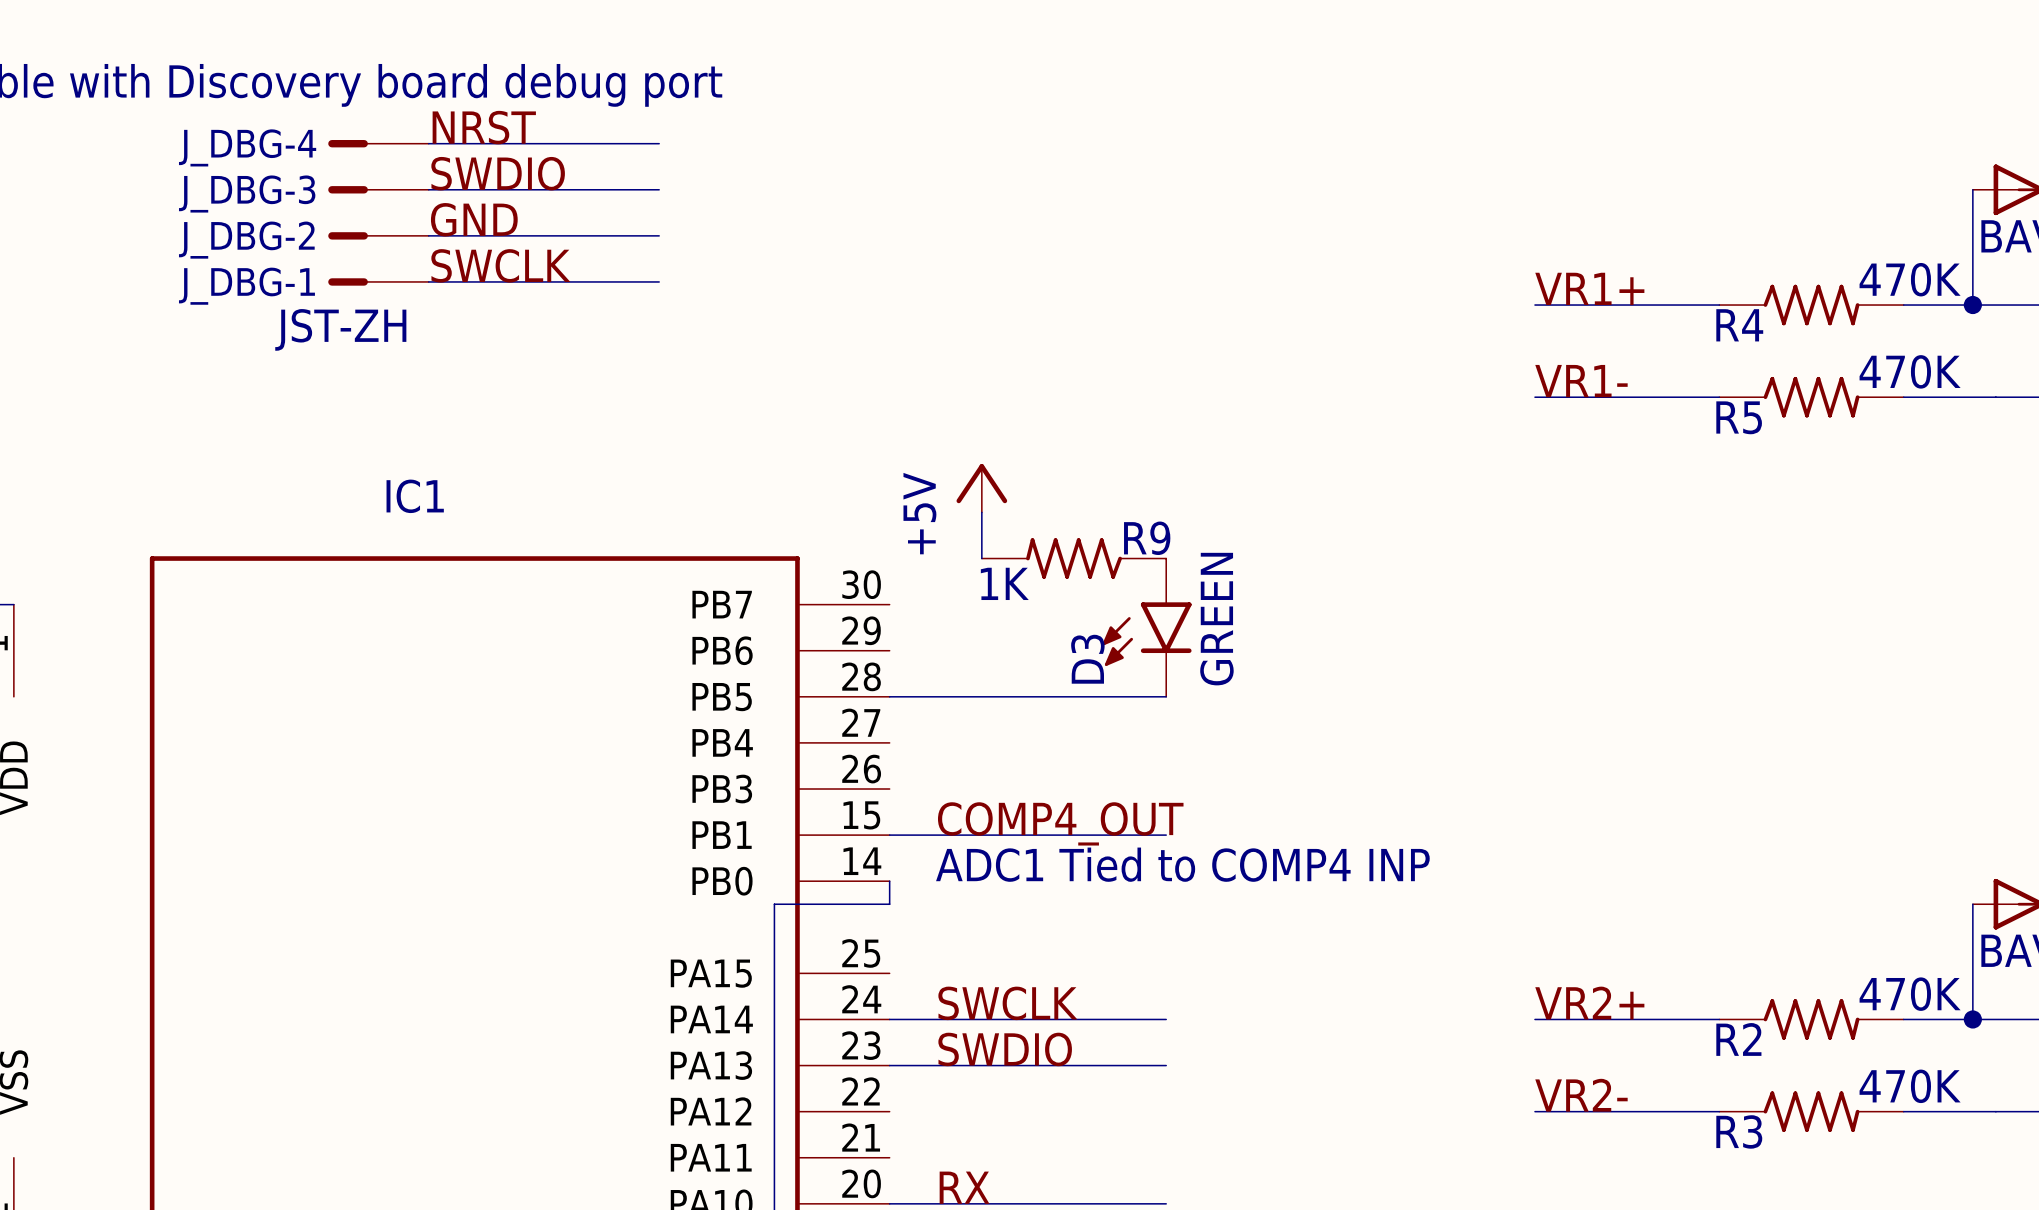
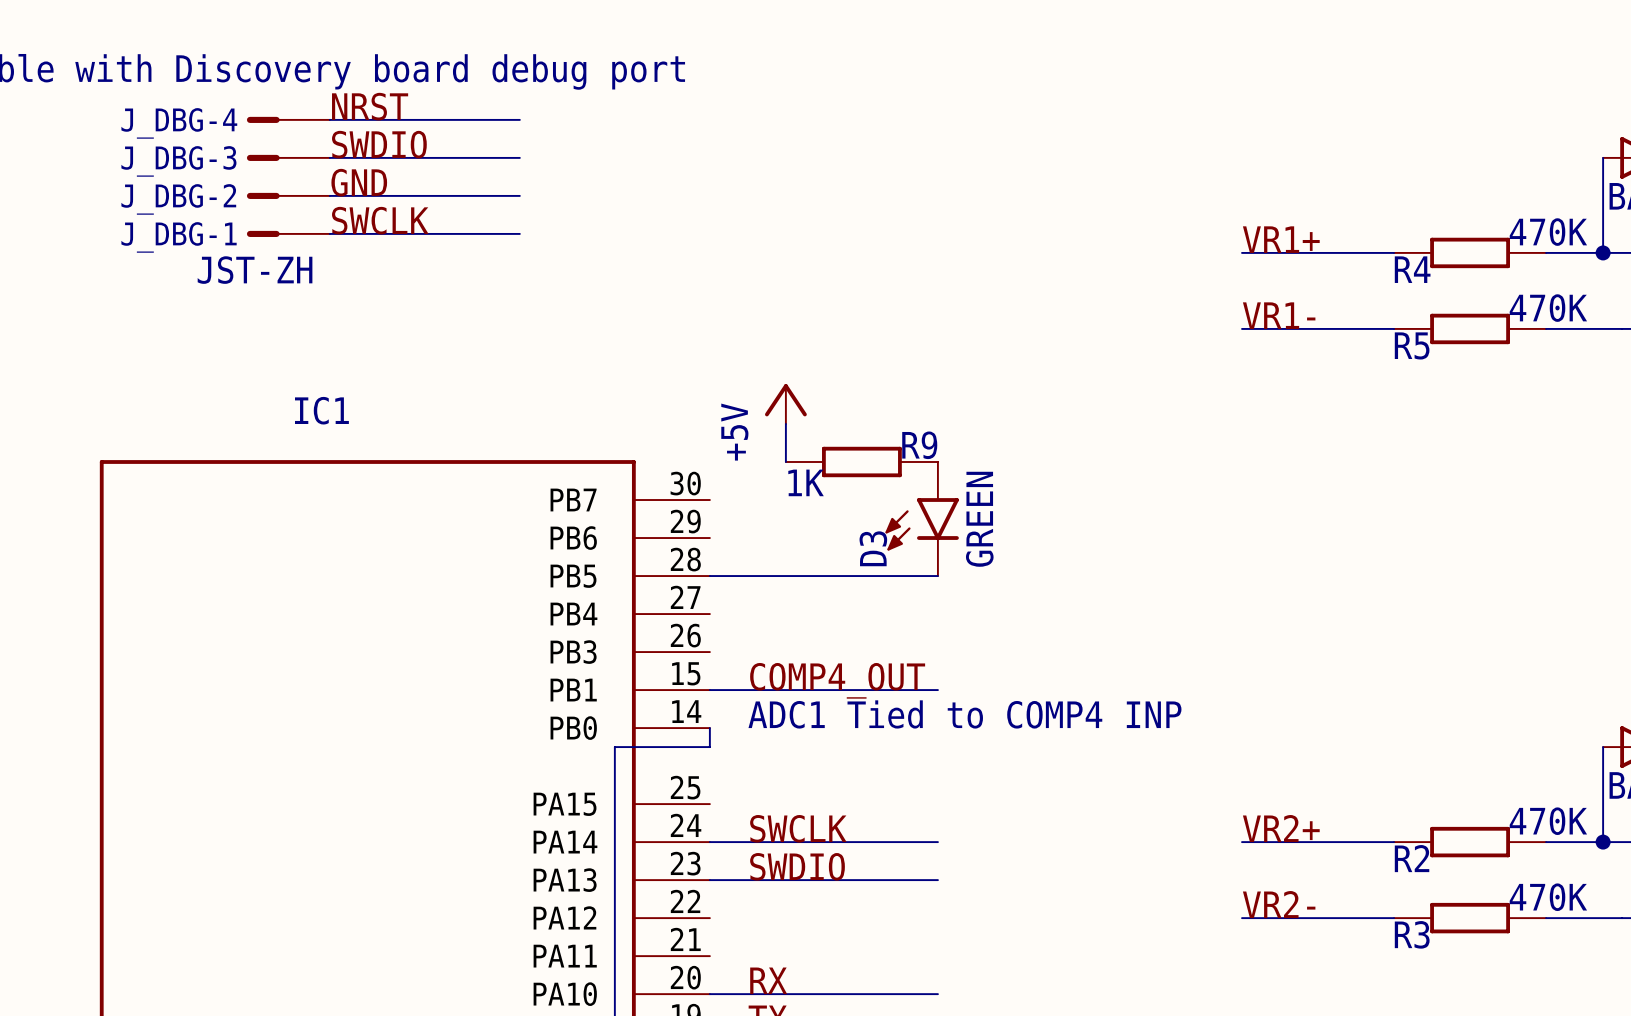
R4 symbol: [1719, 284, 1904, 326] -> [1394, 237, 1547, 269]
R5 symbol: [1719, 376, 1904, 418] -> [1394, 313, 1547, 345]
R9 symbol: [981, 538, 1167, 579] -> [785, 446, 938, 478]
R2 symbol: [1719, 999, 1904, 1040] -> [1394, 826, 1547, 858]
R3 symbol: [1719, 1091, 1904, 1132] -> [1394, 902, 1547, 934]

